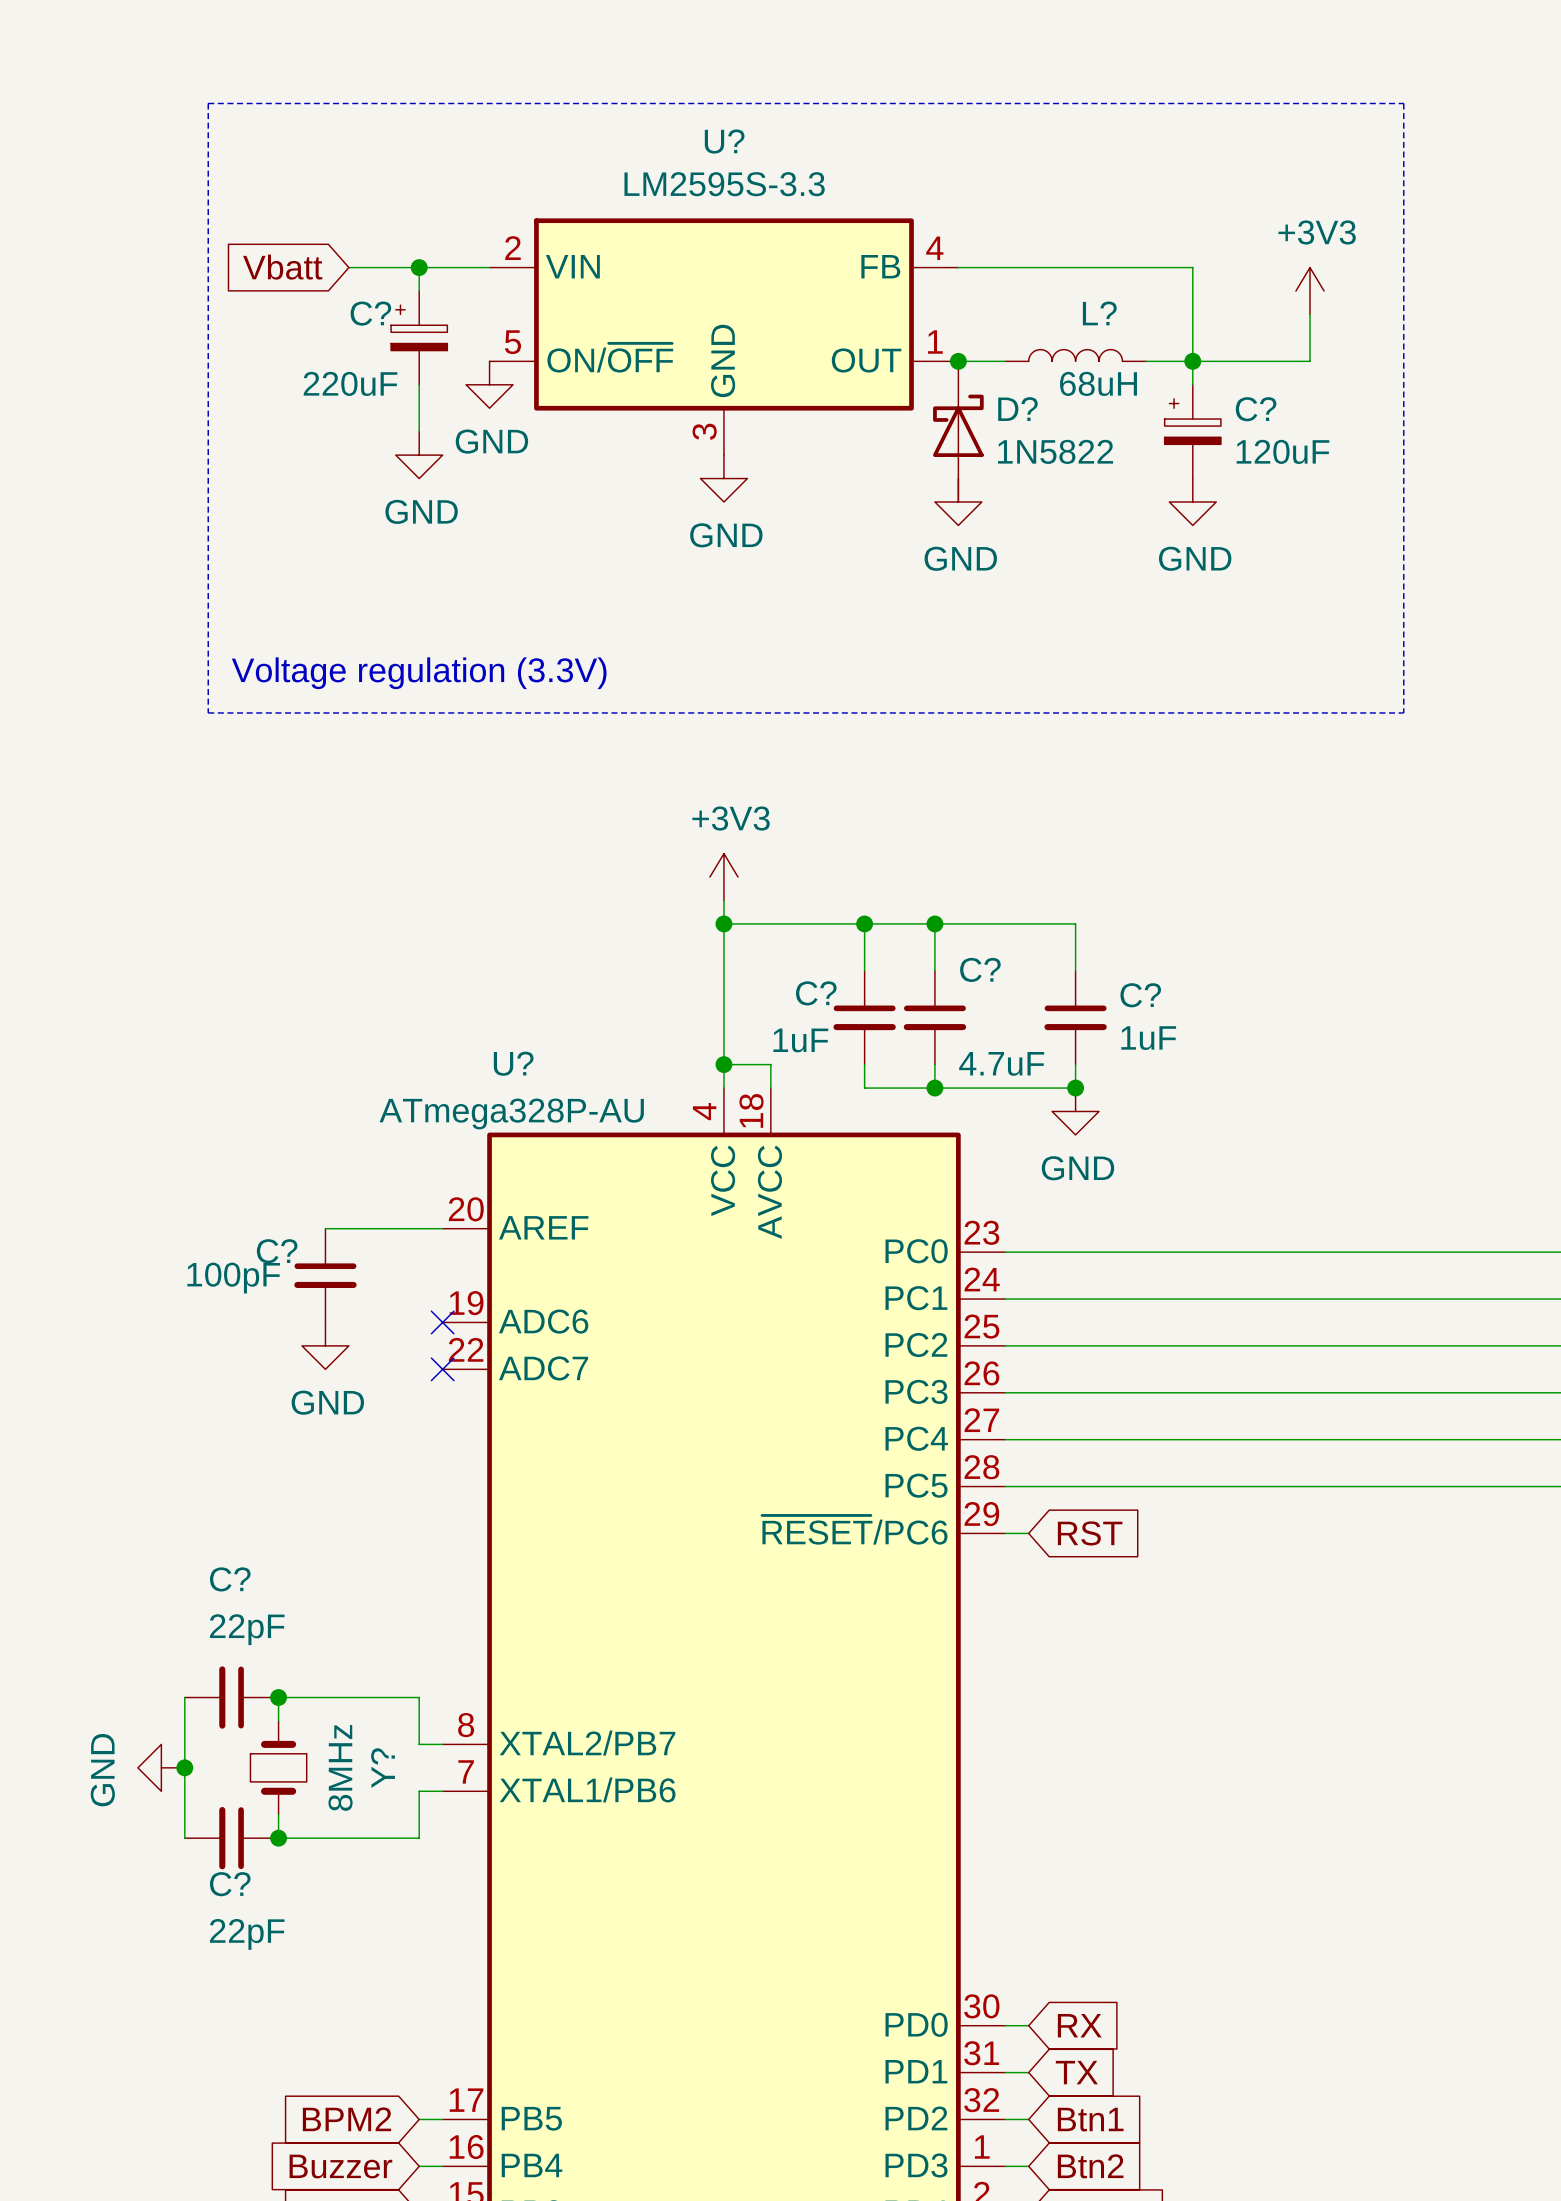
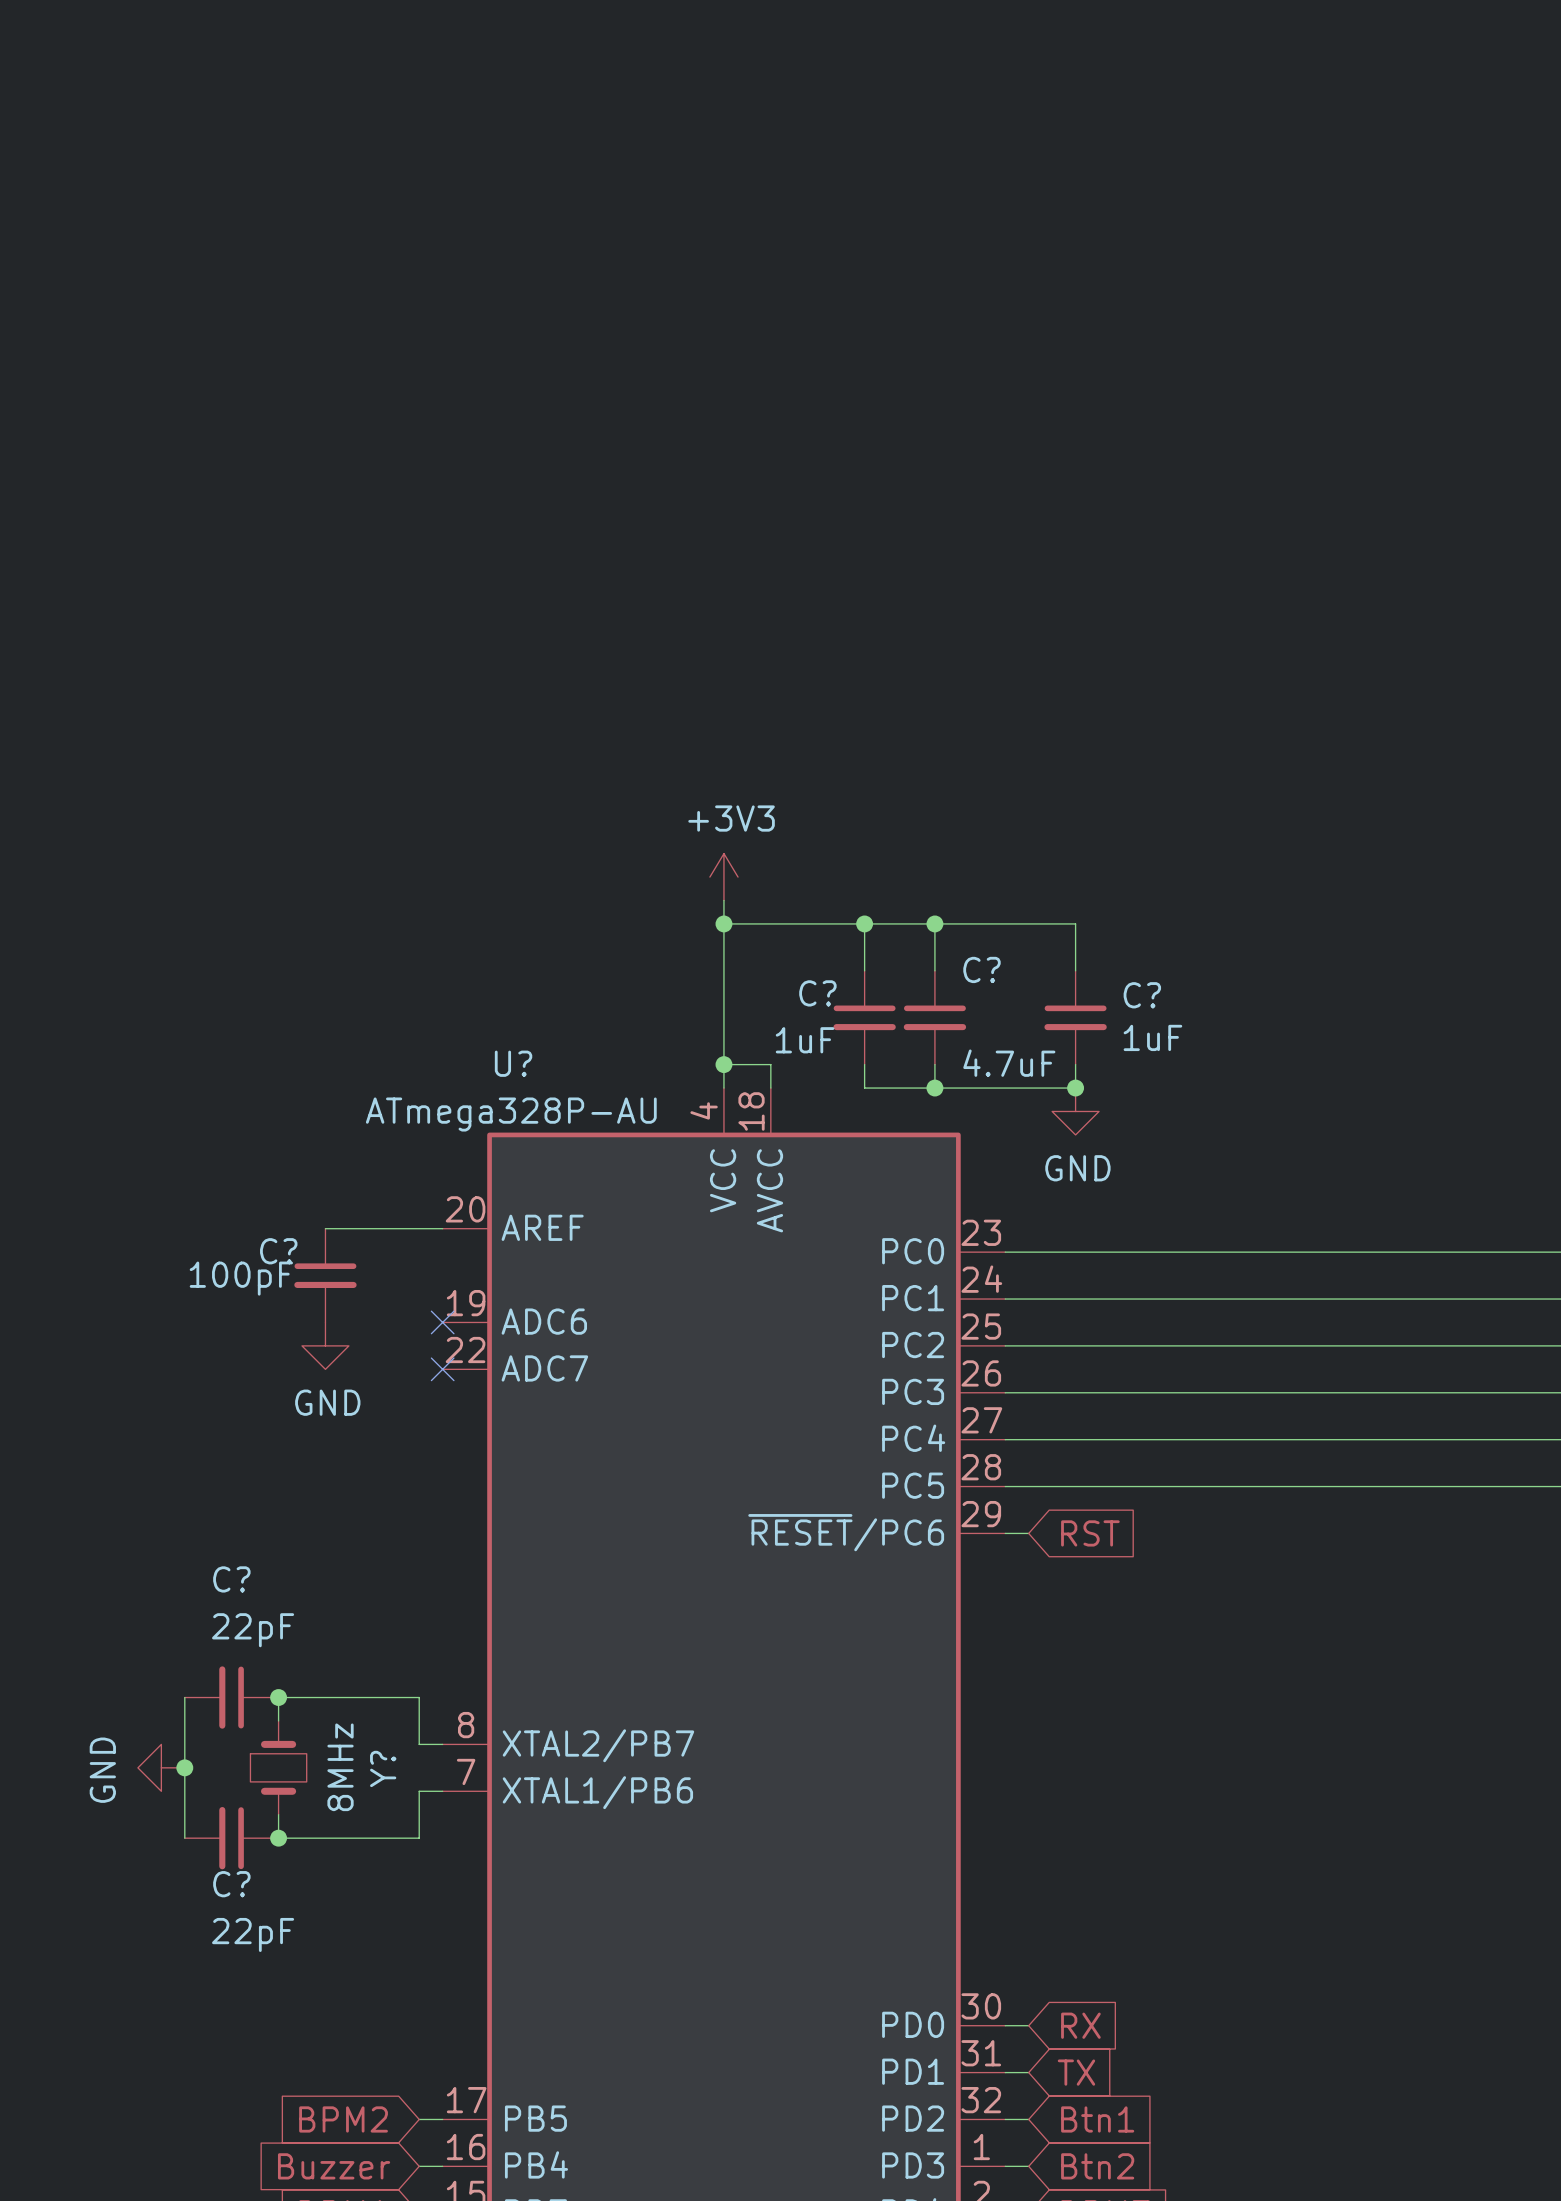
line: (208, 103) (208, 712) (1403, 712) (1403, 103) (208, 103) -> none
global label: Vbatt (282, 267) -> none
wire: (348, 267) (489, 267) -> none
wire: (419, 267) (419, 291) -> none
junction: (419, 267) -> none
wire: (958, 267) (1192, 267) (1192, 384) -> none
power symbol: +3V3 (1310, 291) -> none
wire: (1310, 314) (1310, 361) (1145, 361) -> none
U?: LM2595S-3.3 (723, 336) -> none
C?: 220uF (419, 337) -> none
L?: 68uH (1075, 355) -> none
wire: (958, 361) (1005, 361) -> none
junction: (958, 361) -> none
junction: (1192, 361) -> none
wire: (419, 384) (419, 431) -> none
power symbol: GND (489, 384) -> none
D?: 1N5822 (958, 431) -> none
C?: 120uF (1192, 431) -> none
power symbol: GND (419, 455) -> none
power symbol: GND (723, 478) -> none
power symbol: GND (958, 502) -> none
power symbol: GND (1192, 502) -> none
text: Voltage regulation (3.3V) (419, 673) -> none

